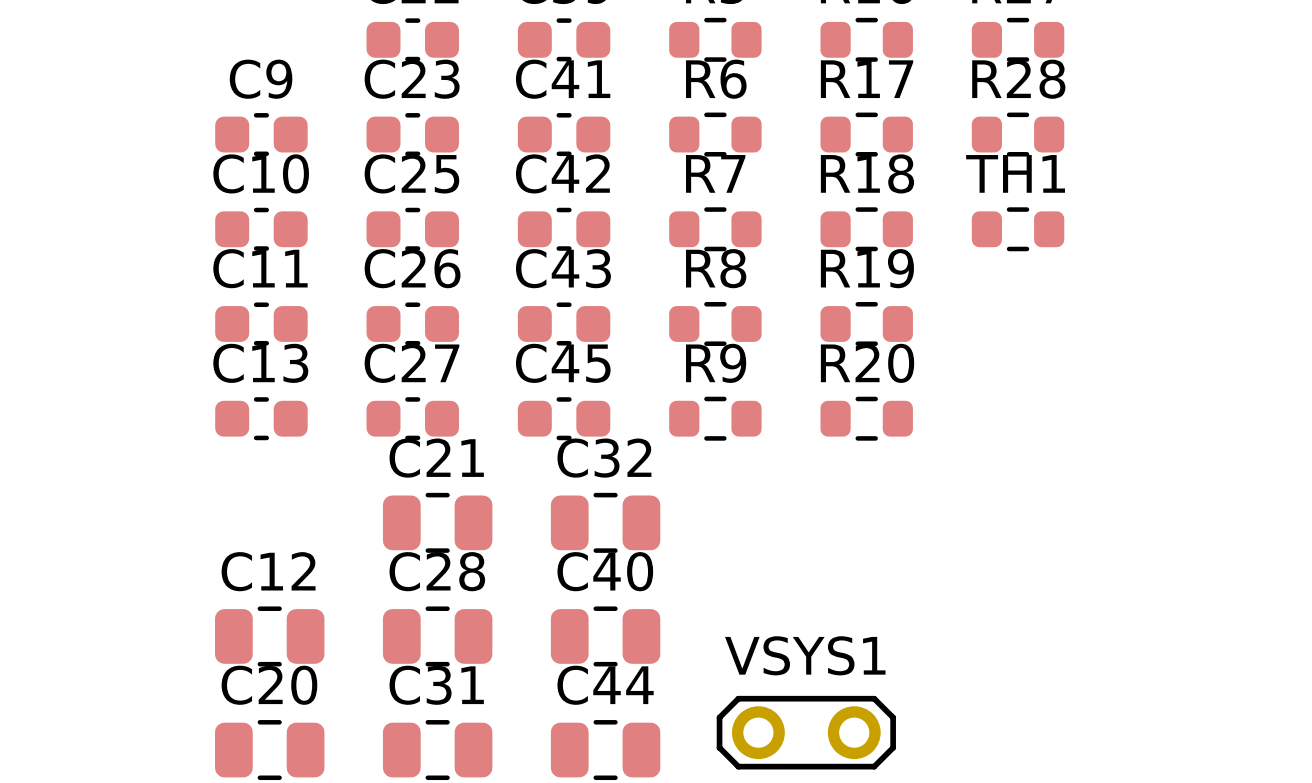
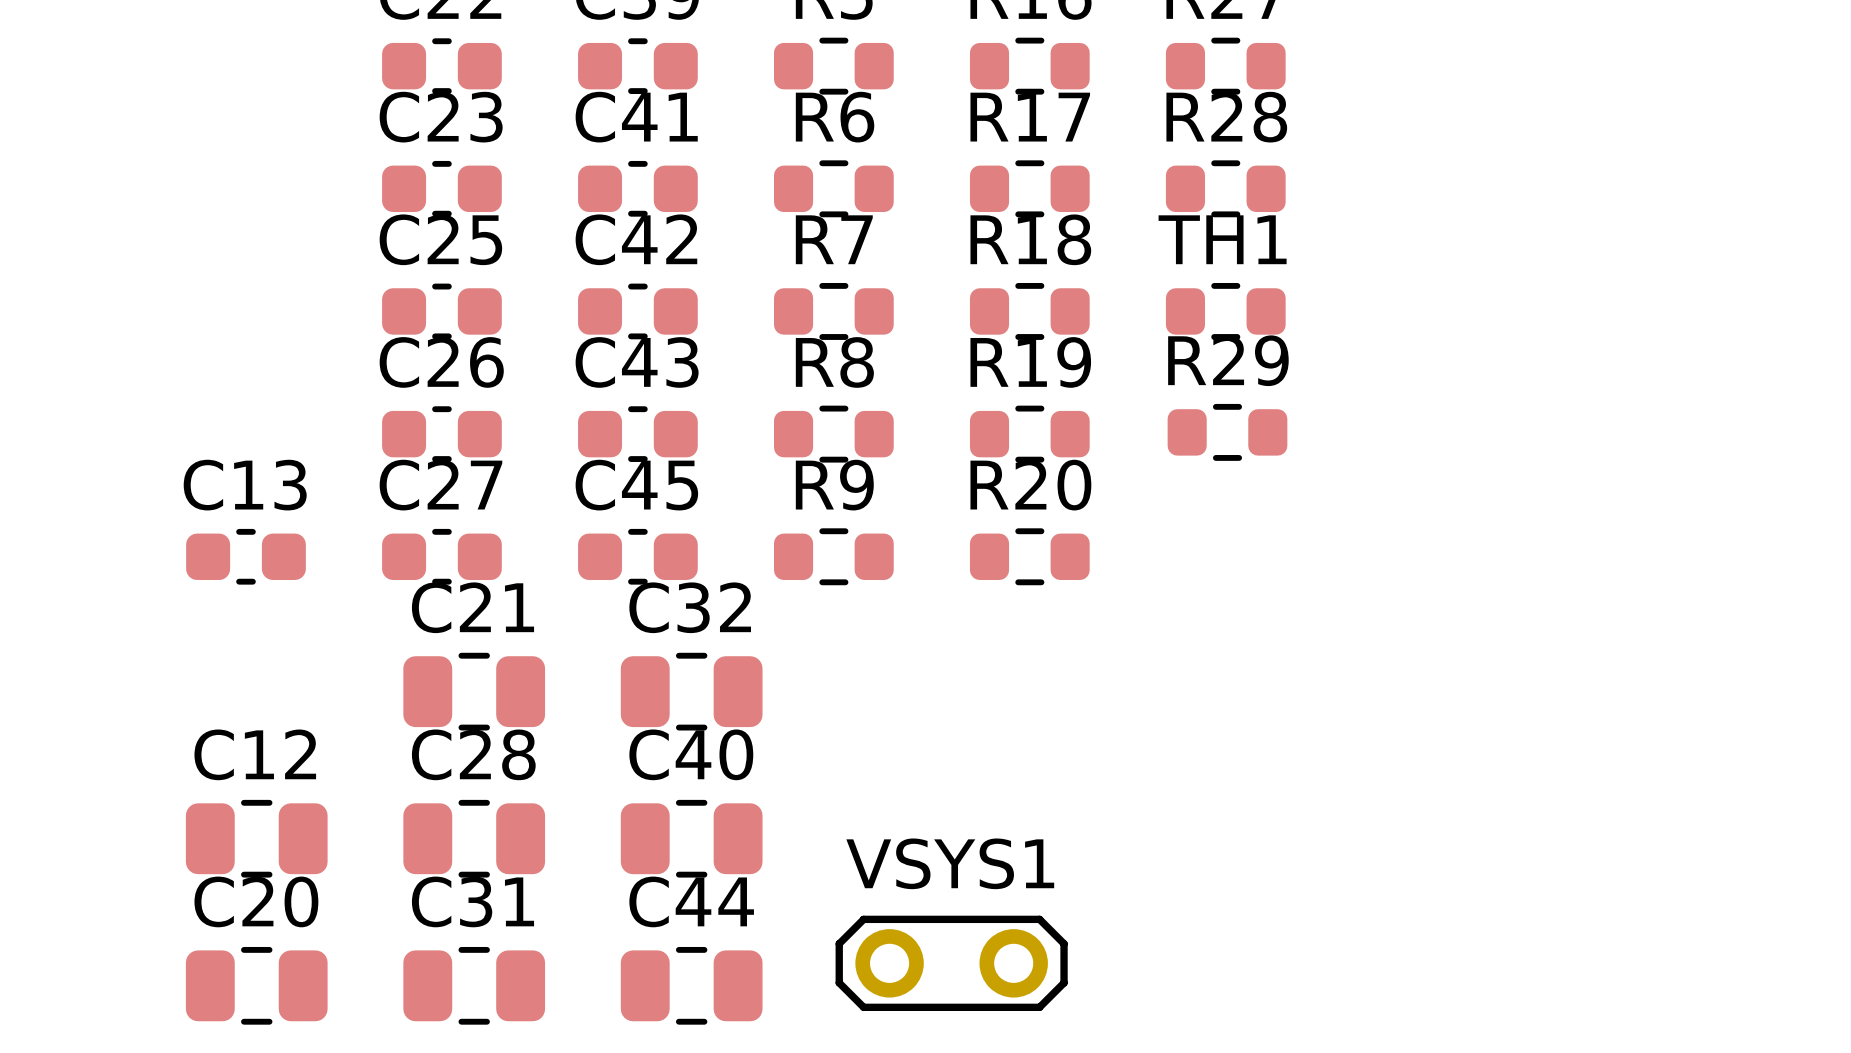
C9: (261, 134) -> none
C10: (261, 229) -> none
R29: none -> (1227, 432)
C11: (261, 323) -> none

